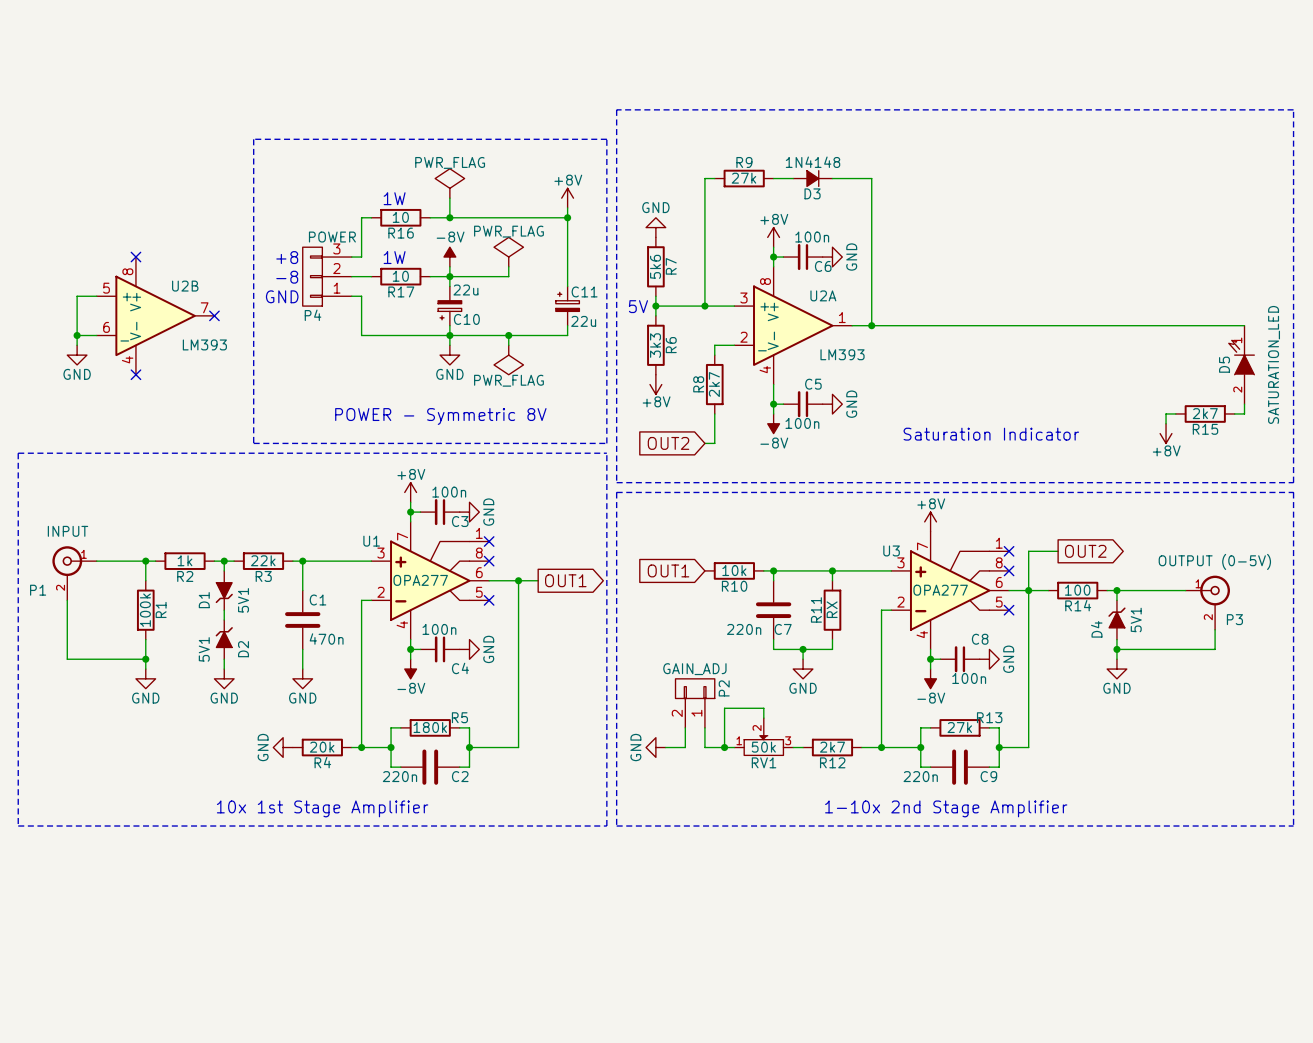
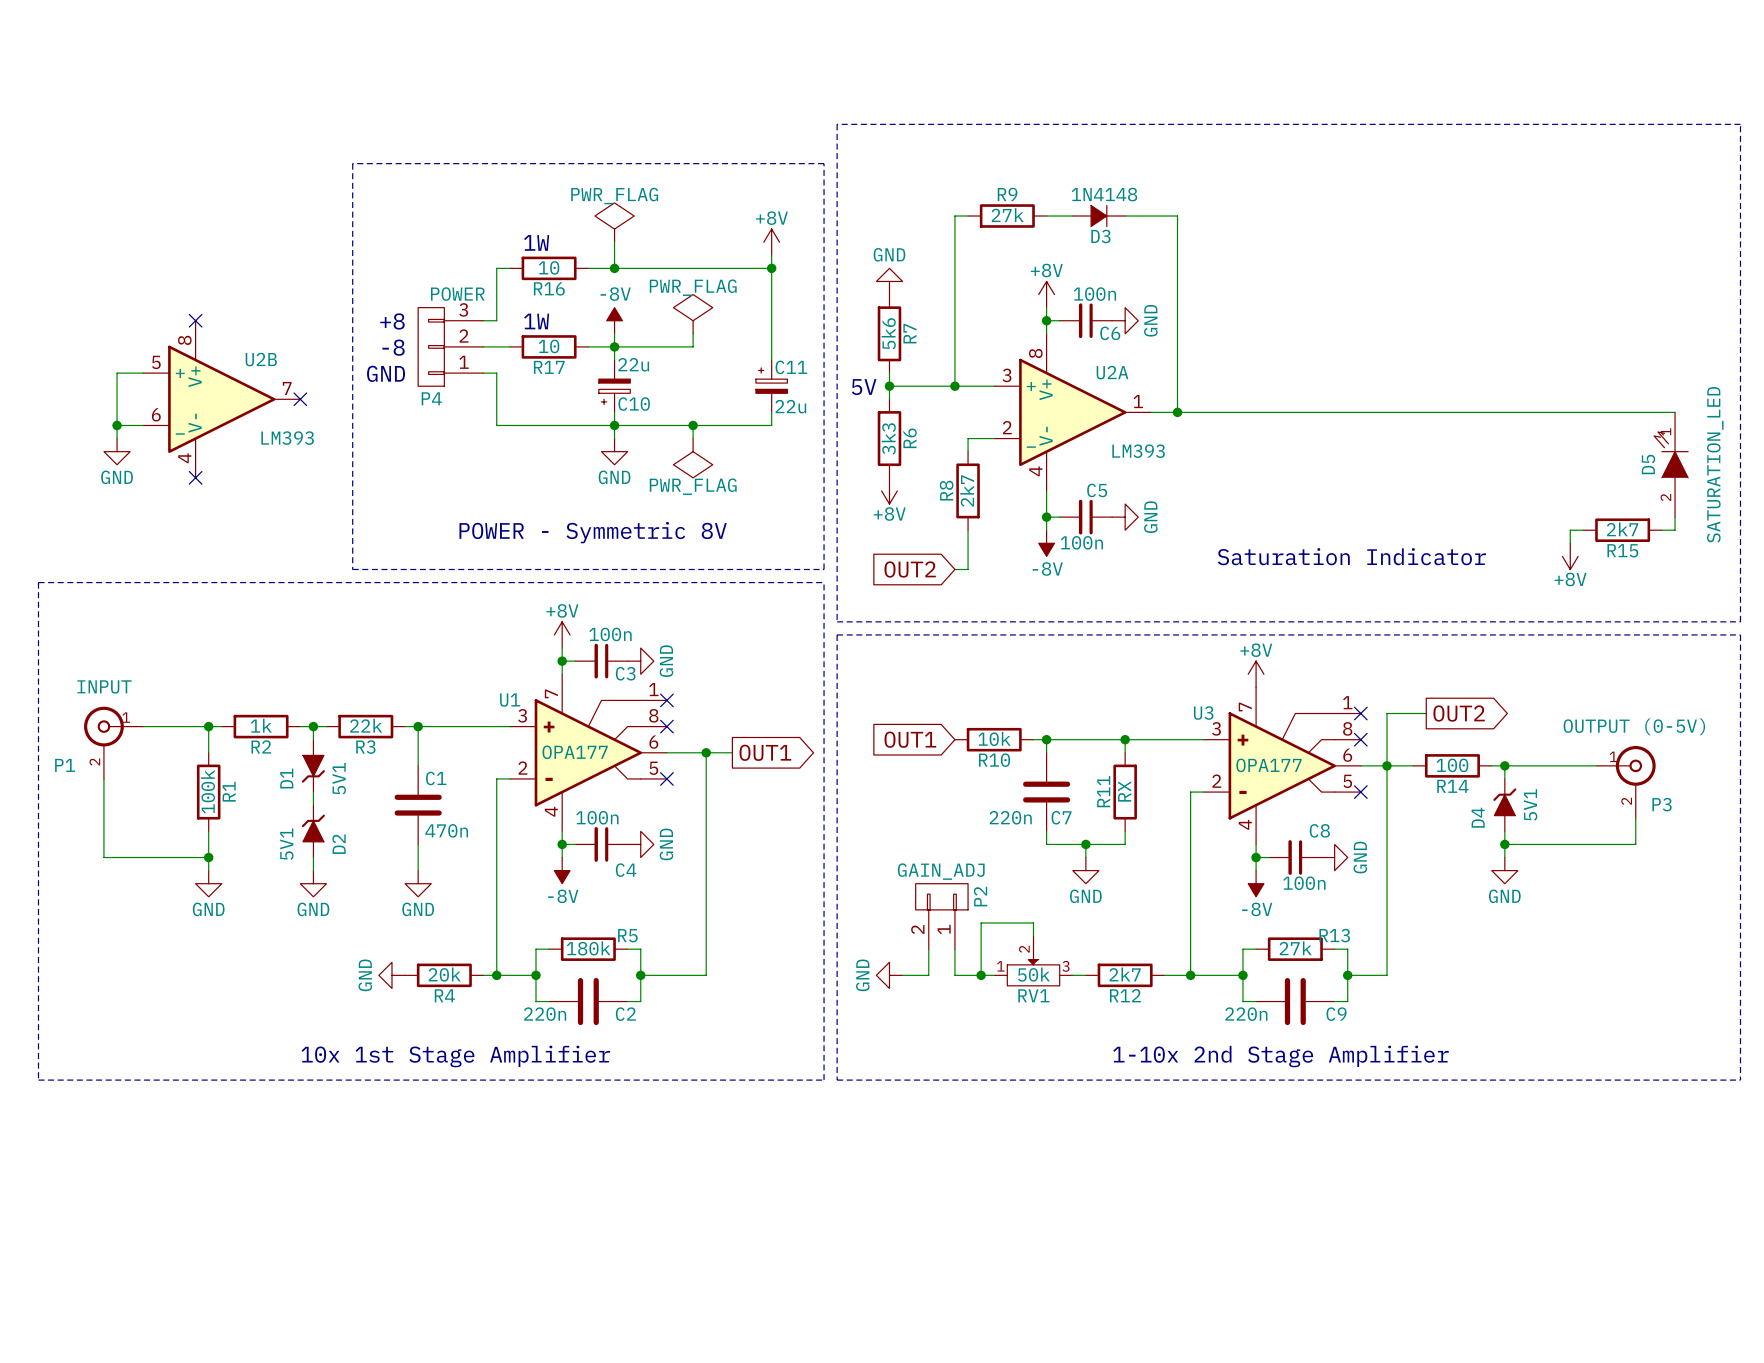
U1 value: OPA277 (420, 580) -> OPA177 (575, 752)
U3 value: OPA277 (940, 590) -> OPA177 (1269, 765)

